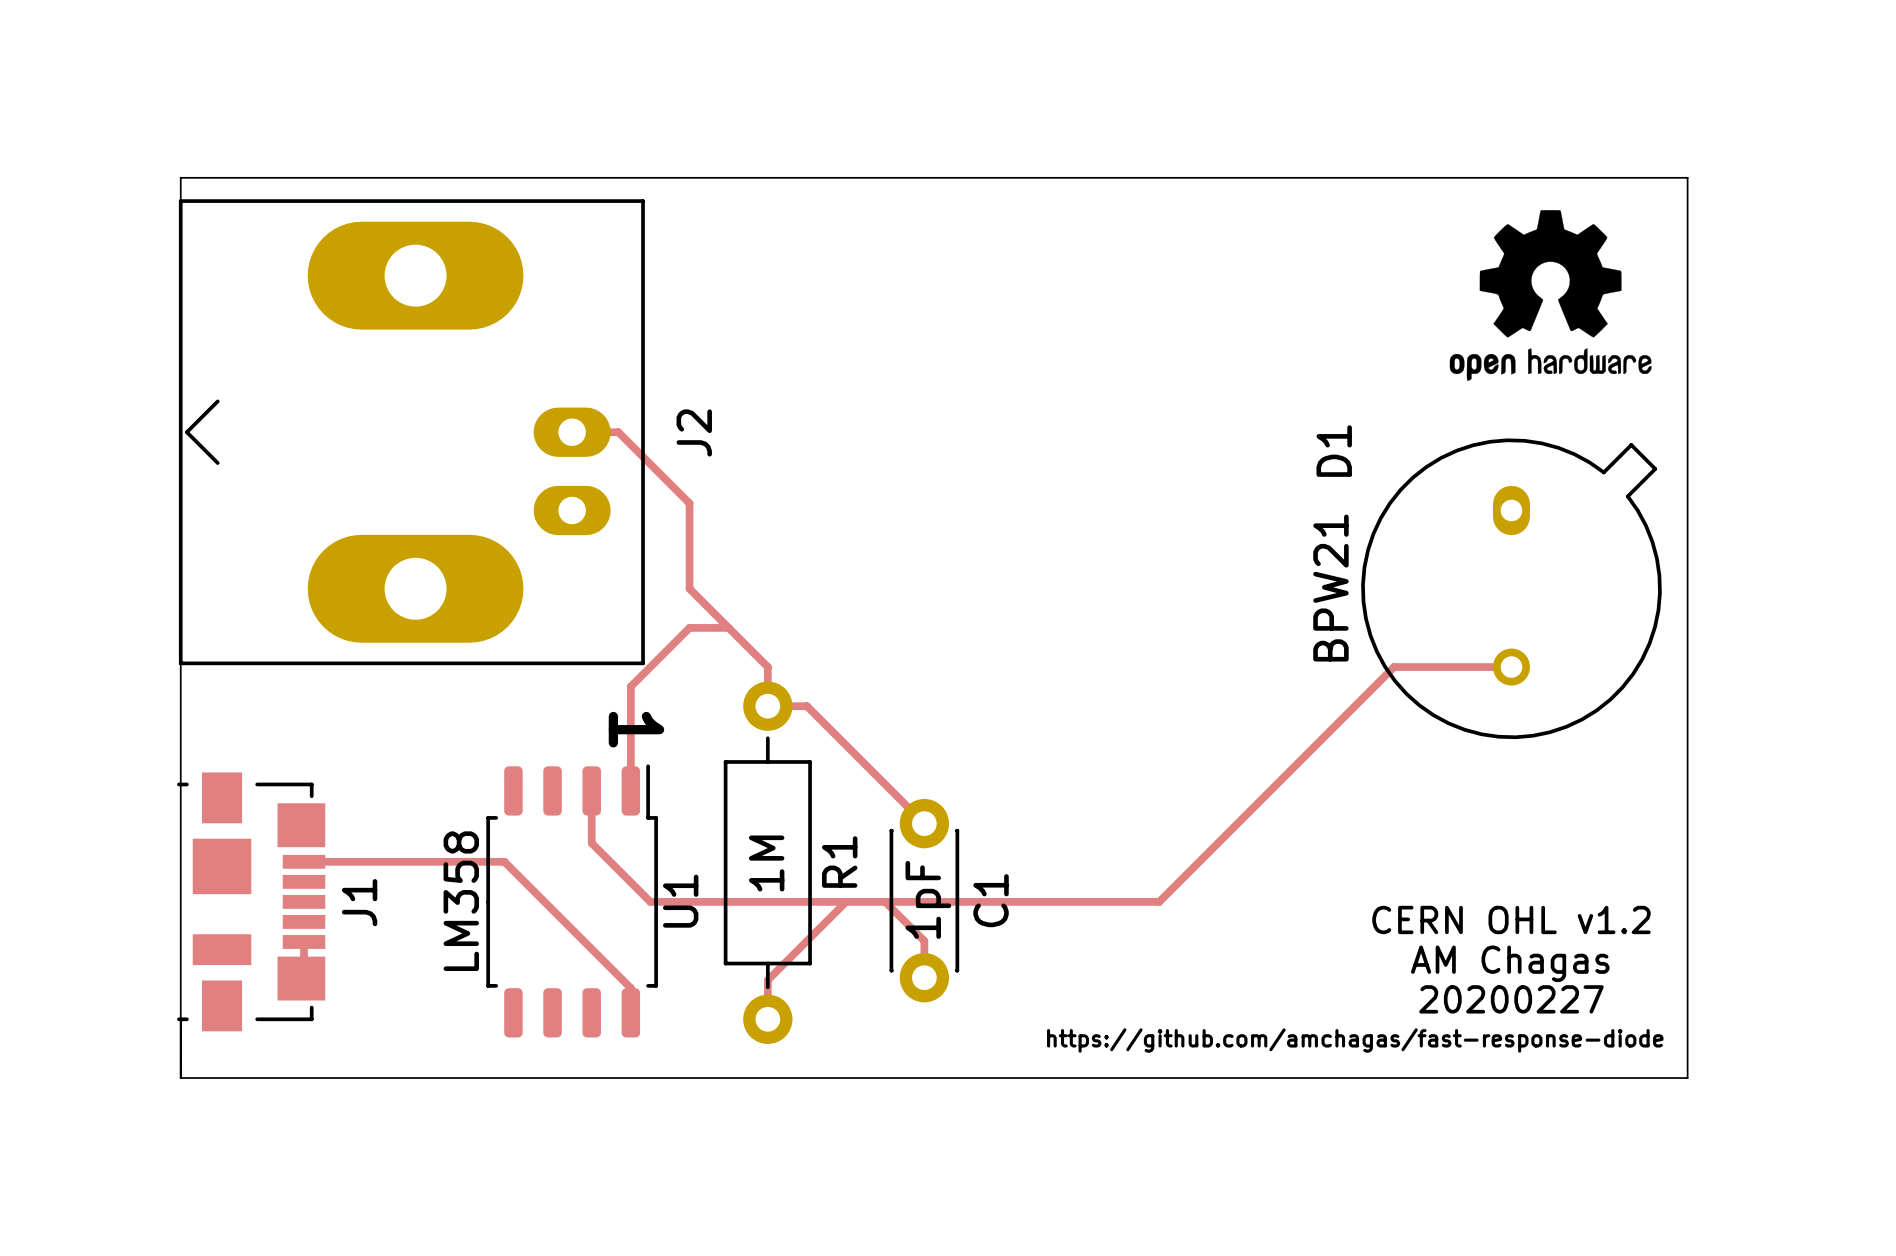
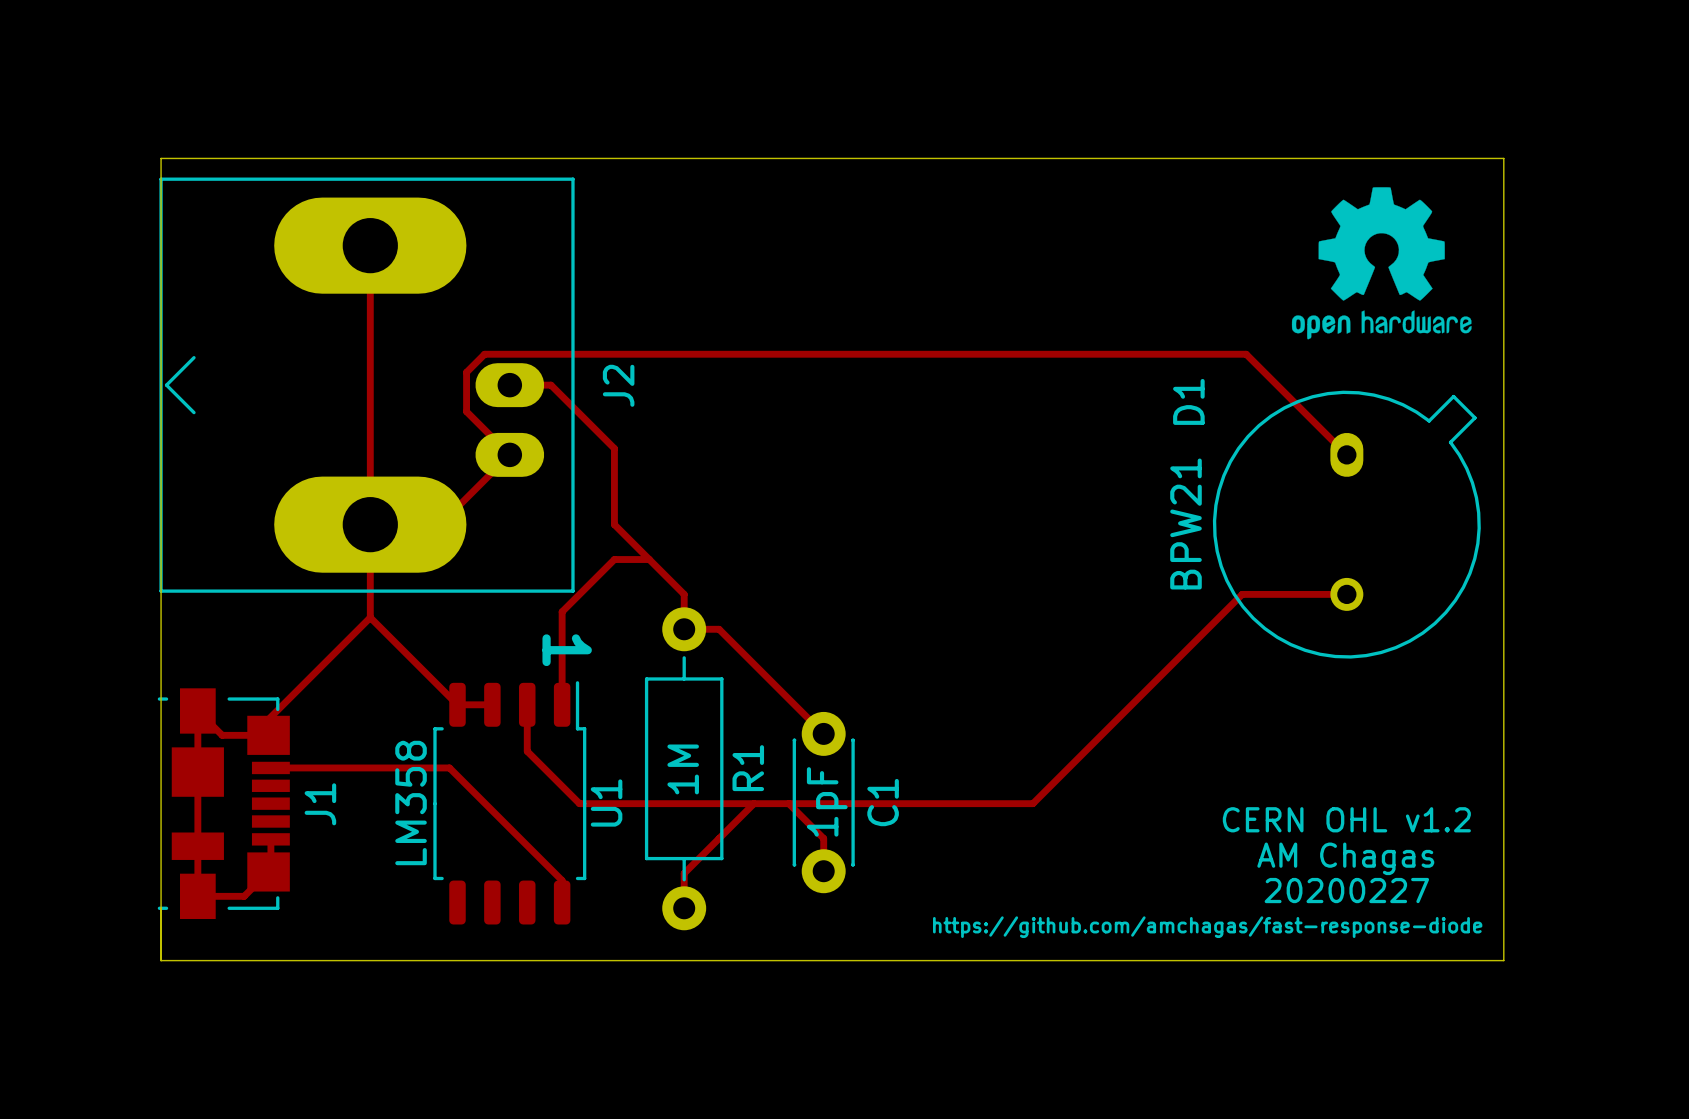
top track: none -> (370, 245) (370, 617)
top track: none -> (1346, 454) (1246, 354) (484, 354) (466, 372) (466, 411) (509, 454) (440, 524) (370, 524)
top track: none -> (370, 617) (457, 704) (492, 704)
top track: none -> (370, 617) (268, 719) (268, 735) (222, 735) (197, 710) (197, 896) (244, 896) (268, 871)

